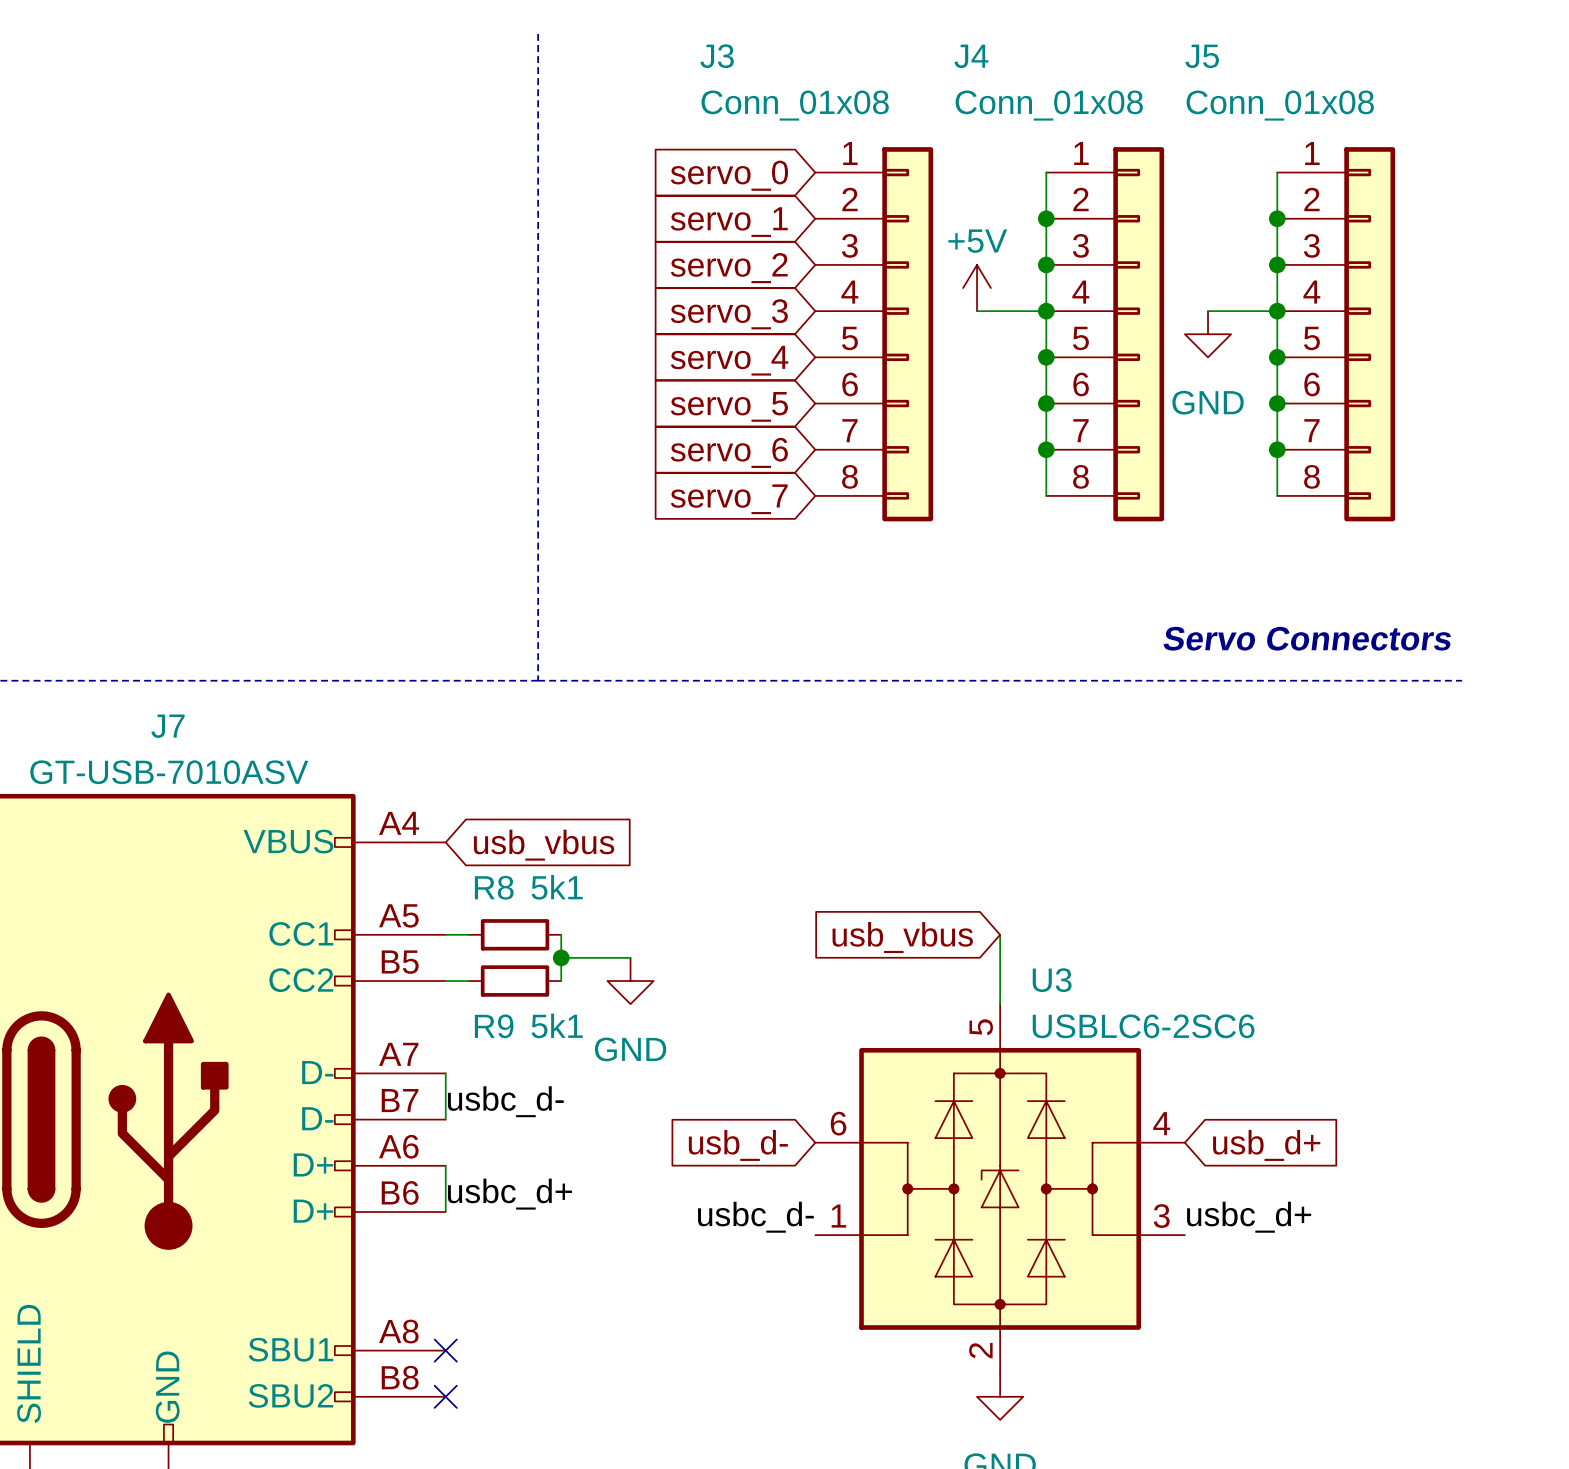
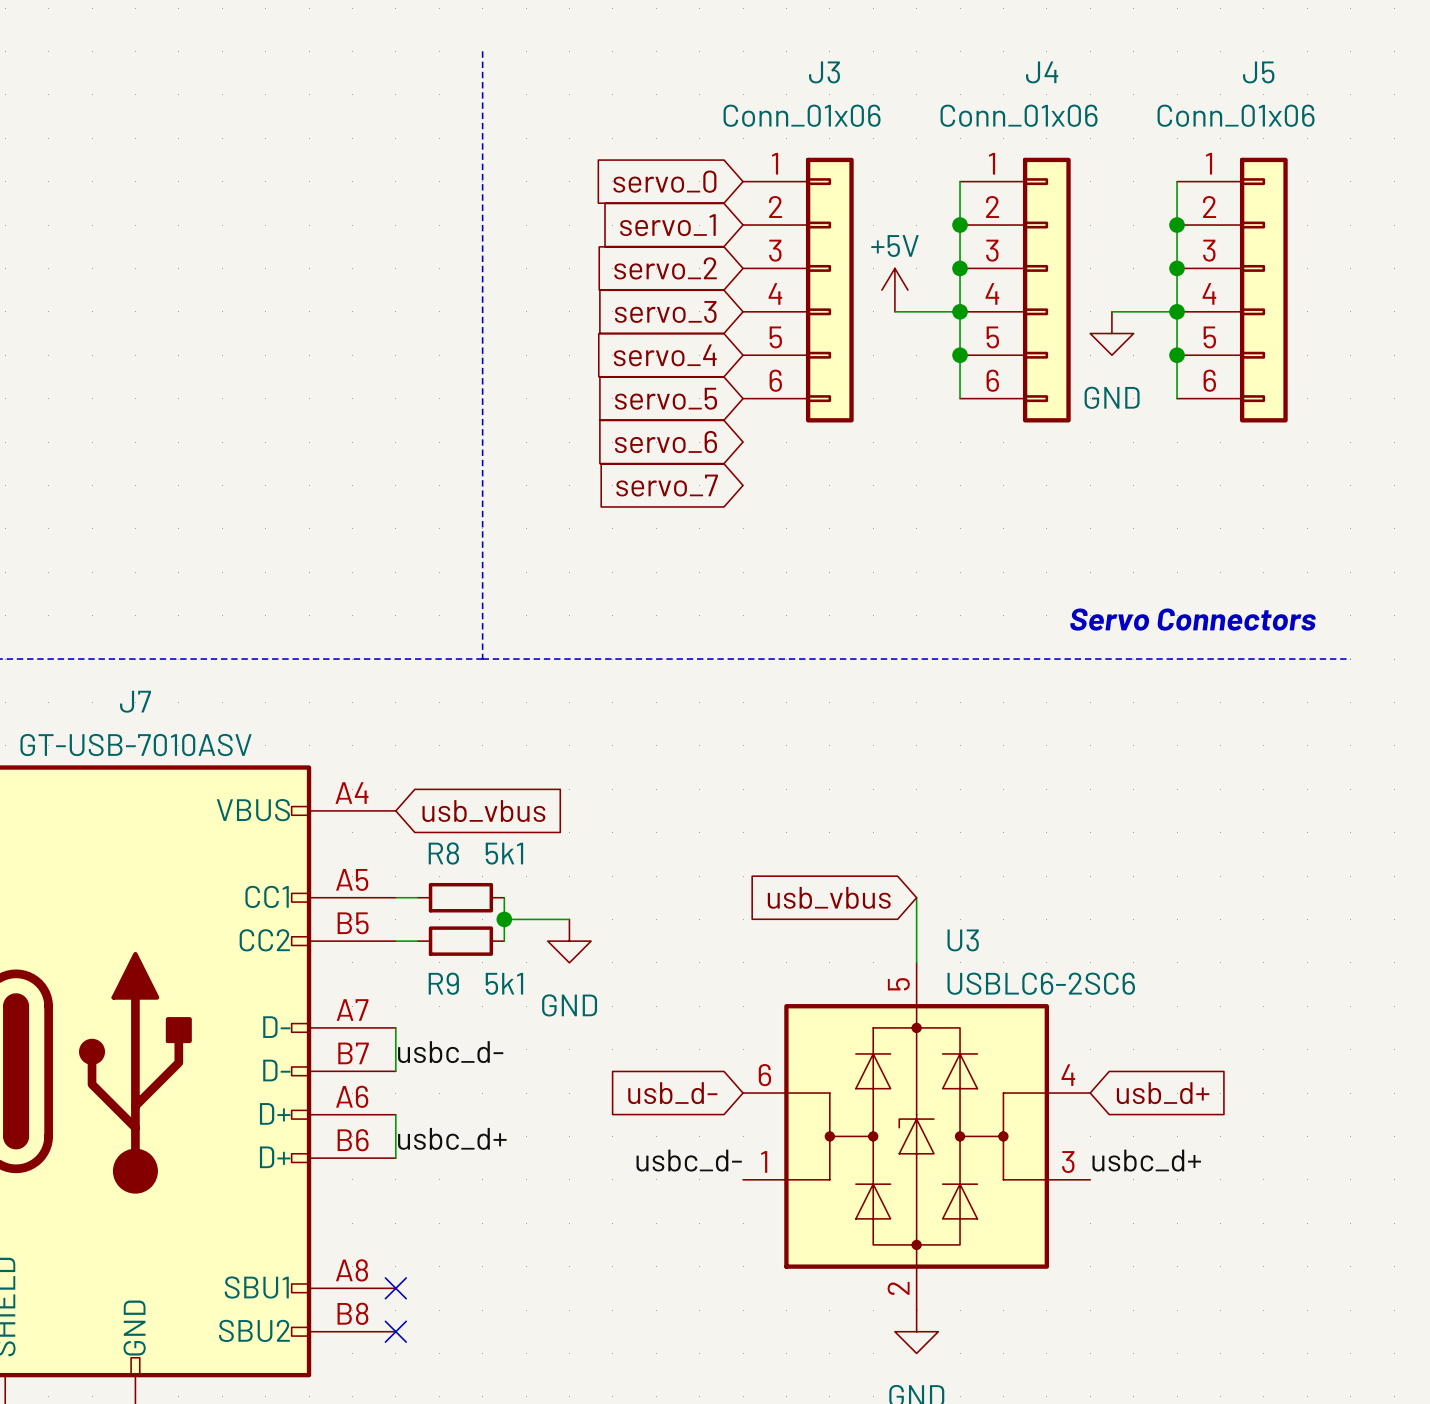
J3 name position: J3 (717, 56) -> J3 (824, 72)
J4 name position: J4 (971, 56) -> J4 (1042, 72)
J5 name position: J5 (1202, 56) -> J5 (1258, 72)
J3 value: Conn_01x08 (795, 105) -> Conn_01x06 (802, 115)
J4 value: Conn_01x08 (1049, 105) -> Conn_01x06 (1019, 115)
J5 value: Conn_01x08 (1280, 105) -> Conn_01x06 (1236, 115)
J3 symbol: [815, 147, 934, 522] -> [743, 157, 854, 423]
J4 symbol: [1046, 147, 1165, 522] -> [960, 157, 1071, 423]
J5 symbol: [1277, 147, 1396, 522] -> [1177, 157, 1288, 423]
wire: (1046, 403) (1046, 495) -> none
junction: (1046, 403) -> none
wire: (1277, 403) (1277, 495) -> none
junction: (1277, 403) -> none
junction: (1046, 449) -> none
junction: (1277, 449) -> none

